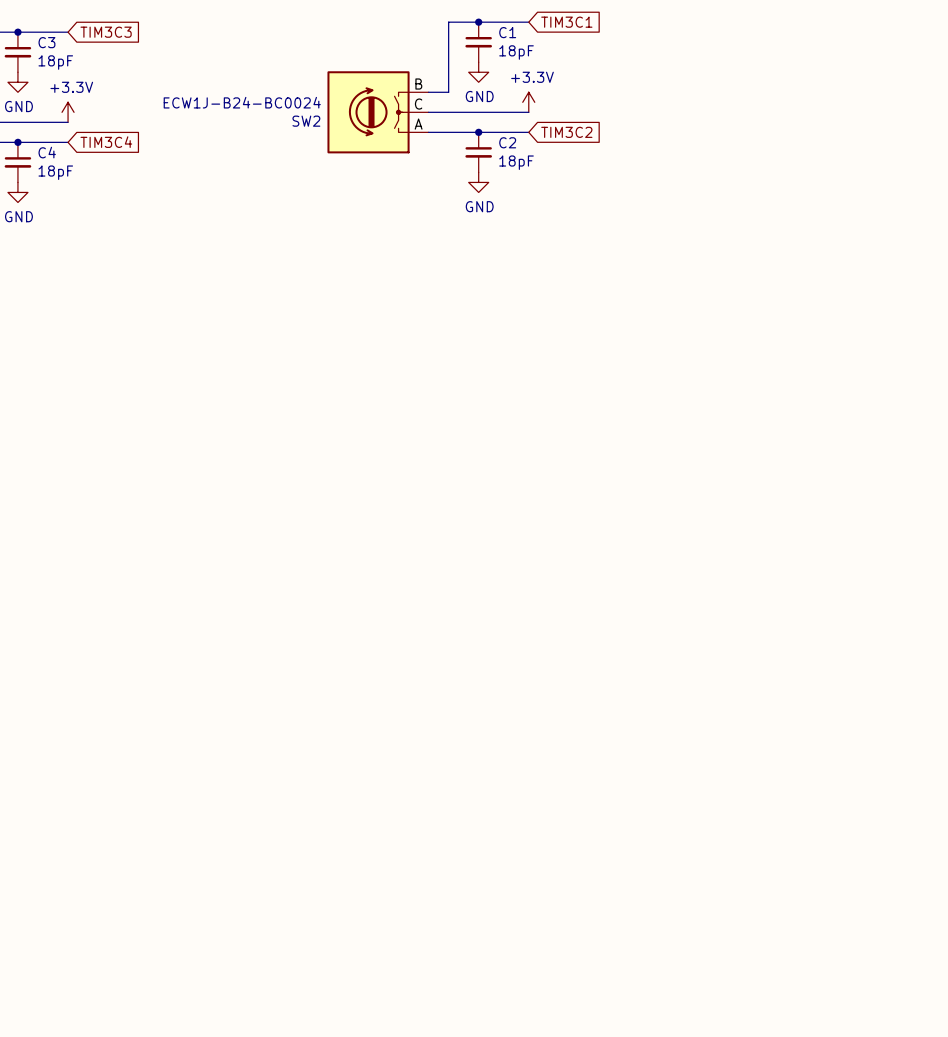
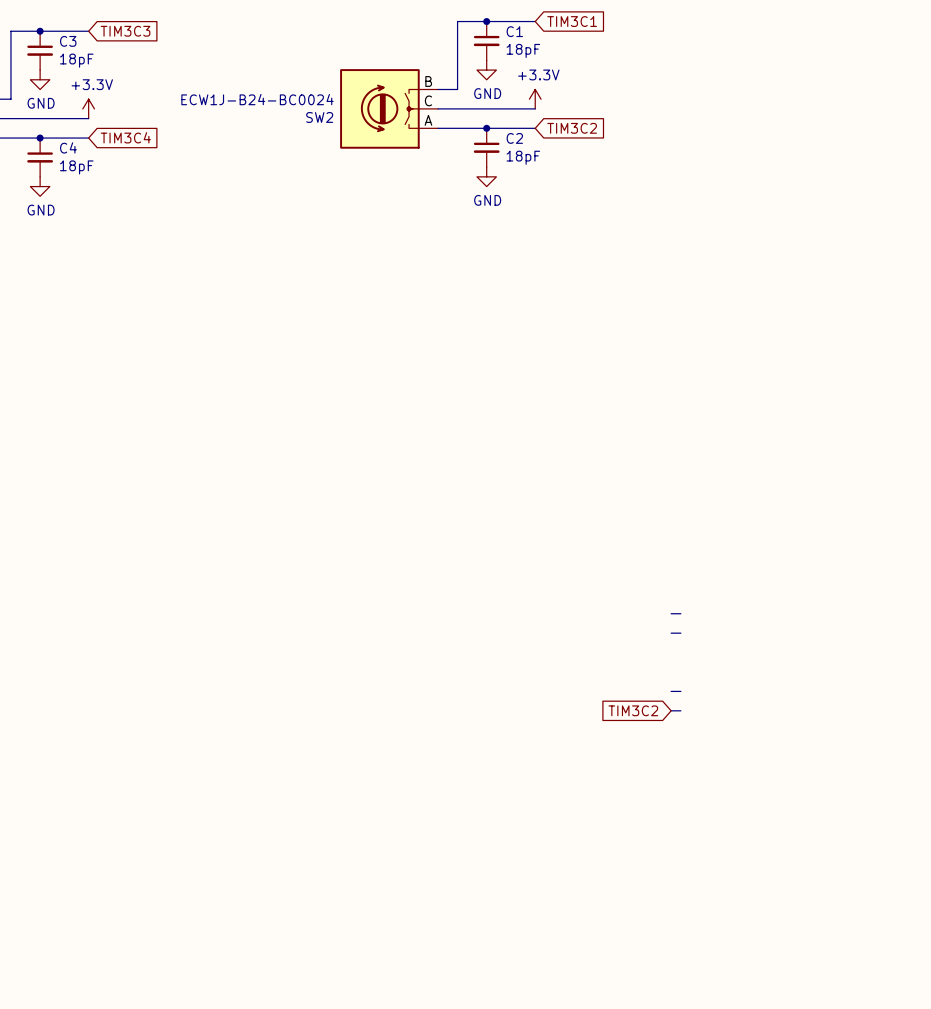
wire: none -> (671, 613) (680, 613)
wire: none -> (671, 633) (680, 633)
wire: none -> (671, 691) (680, 691)
global label: none -> TIM3C2 (633, 710)
wire: none -> (671, 710) (680, 710)

